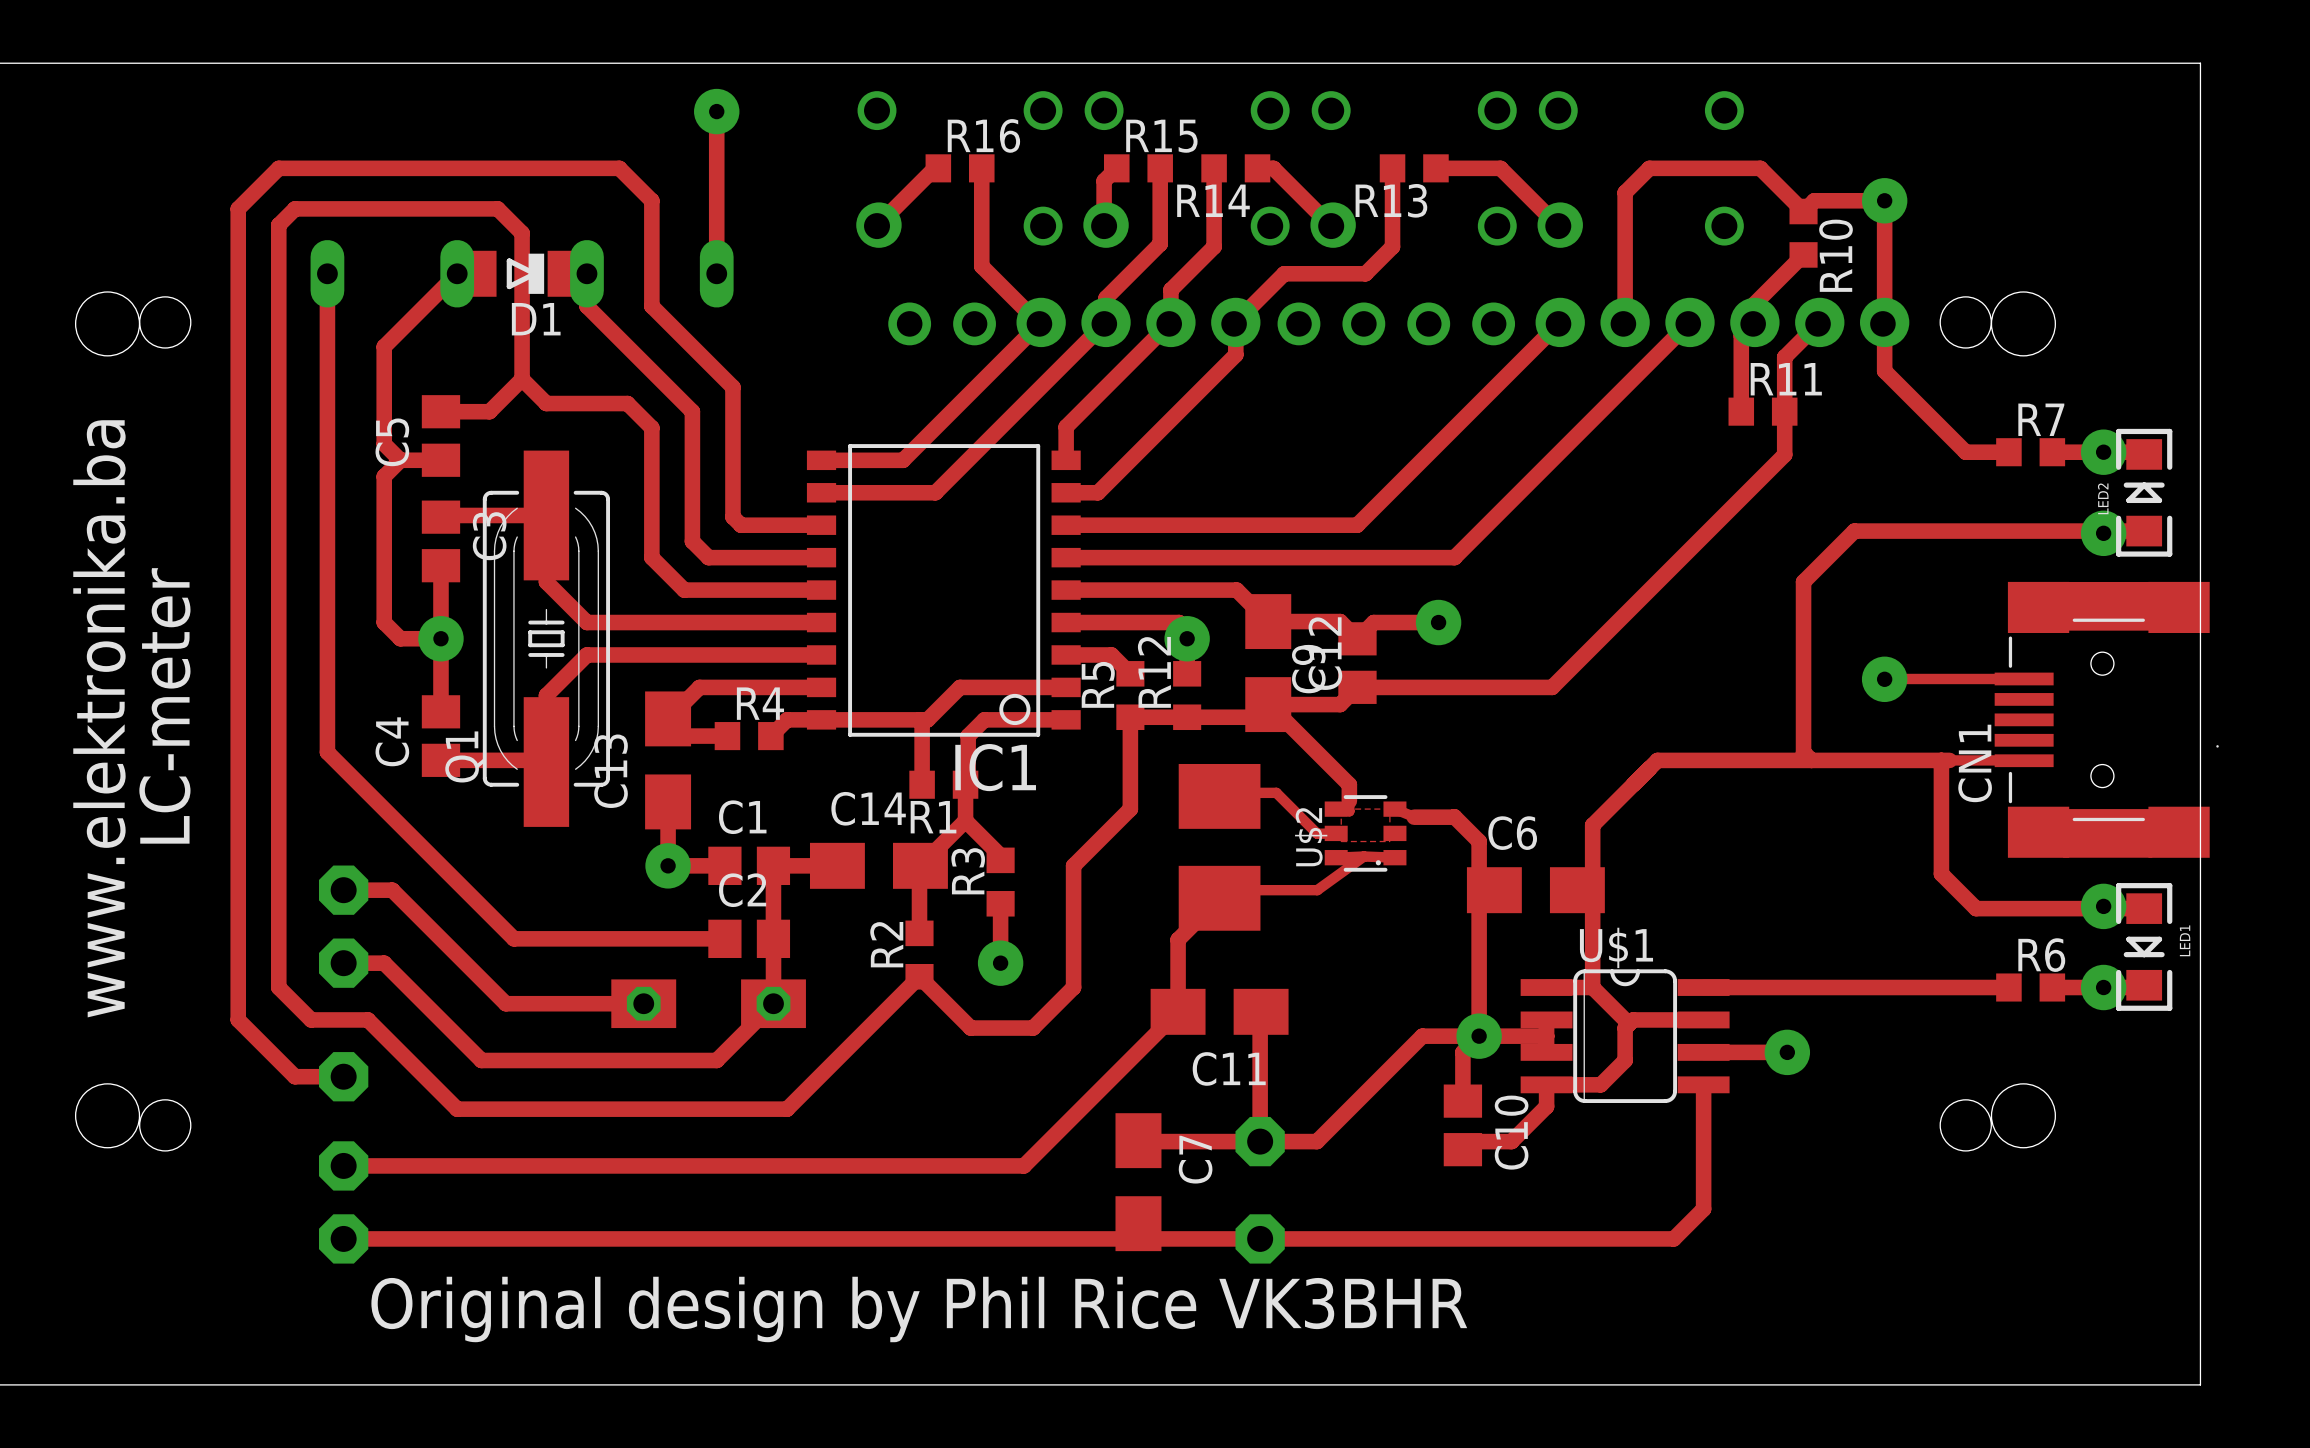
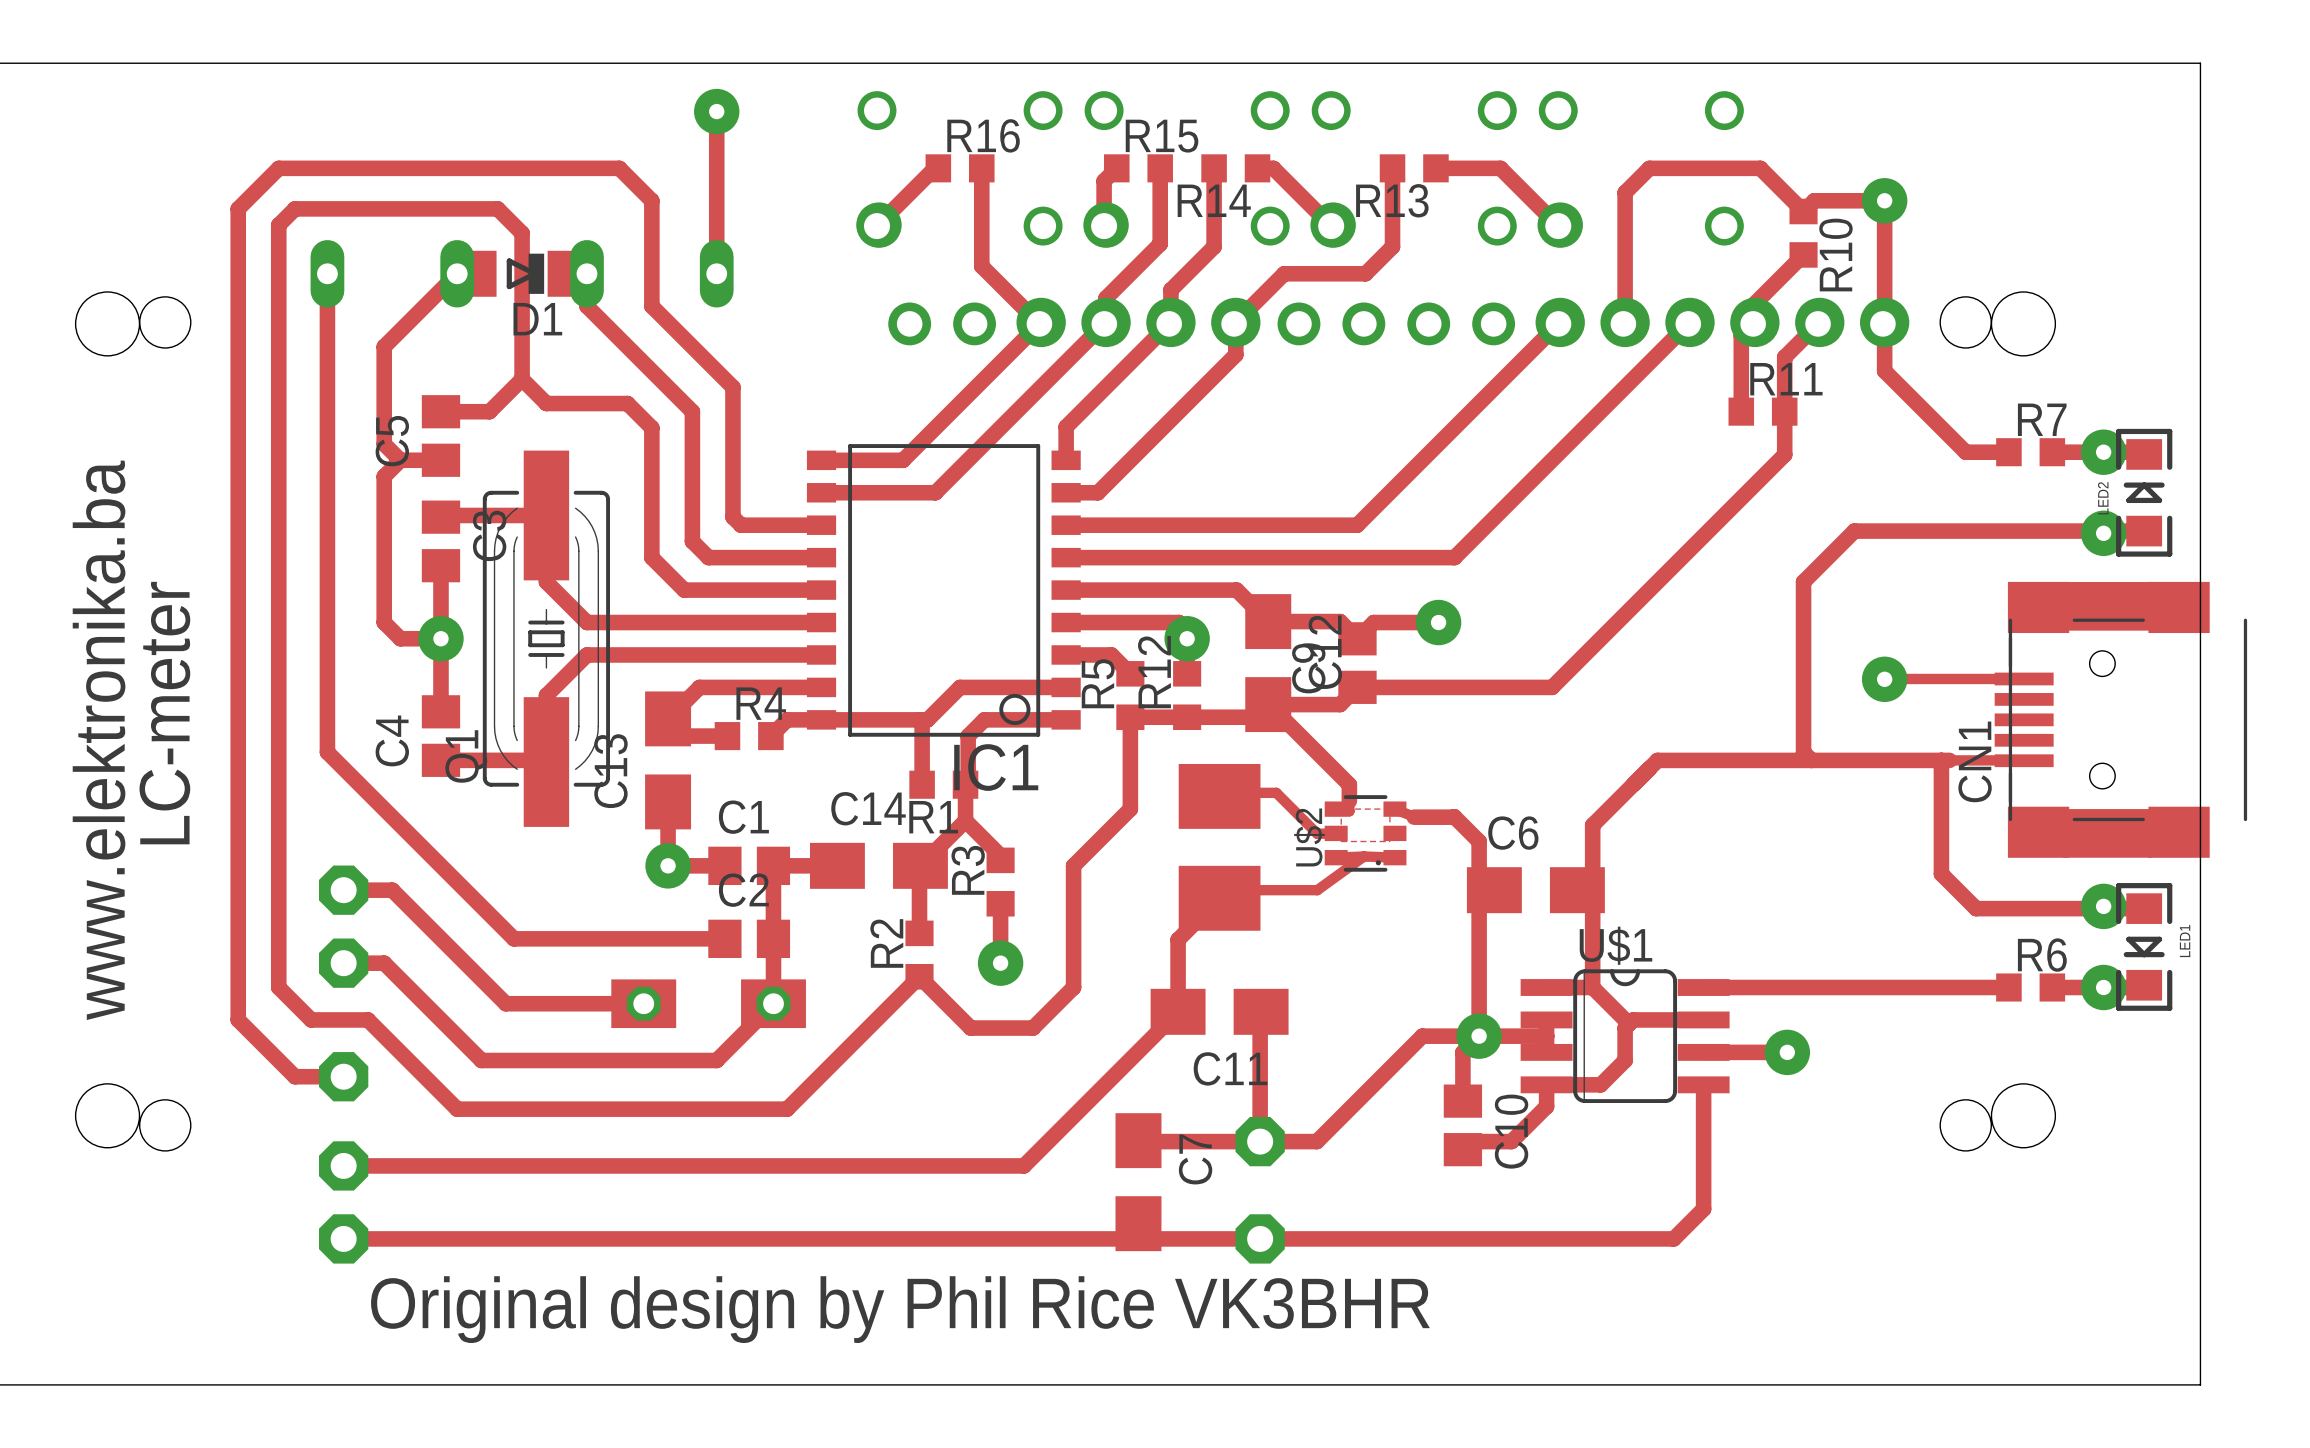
CN1 footprint: [1994, 581, 2219, 858] -> [1994, 581, 2248, 858]

